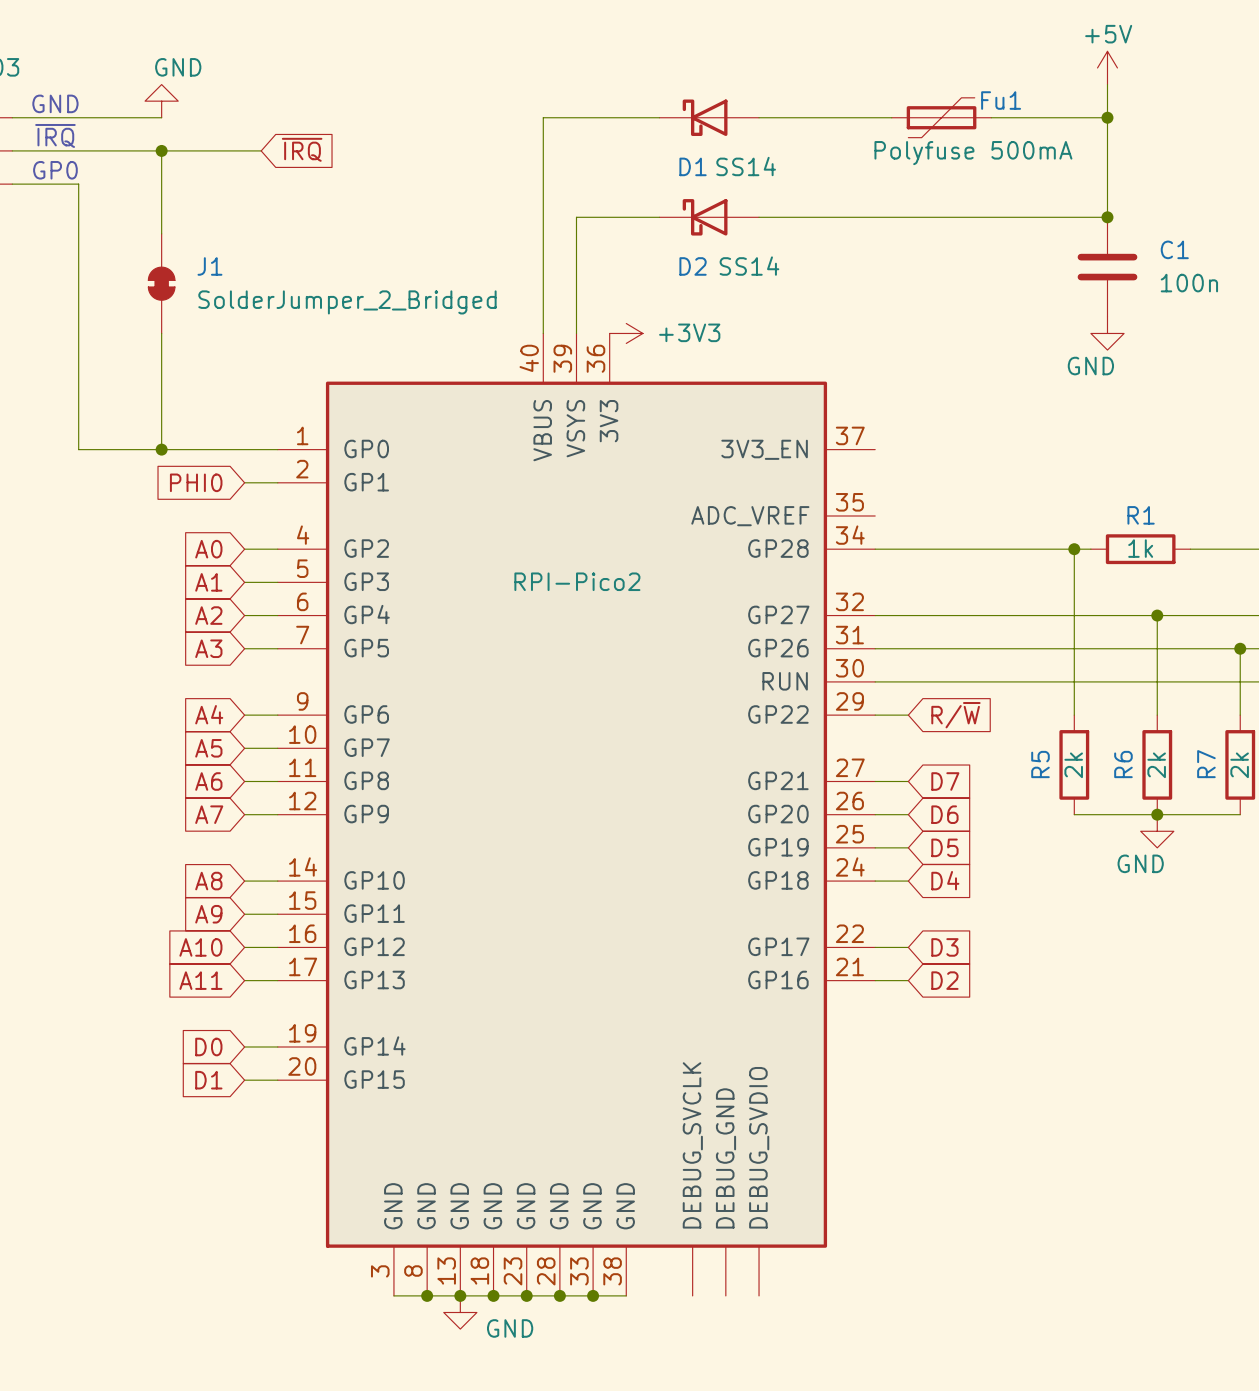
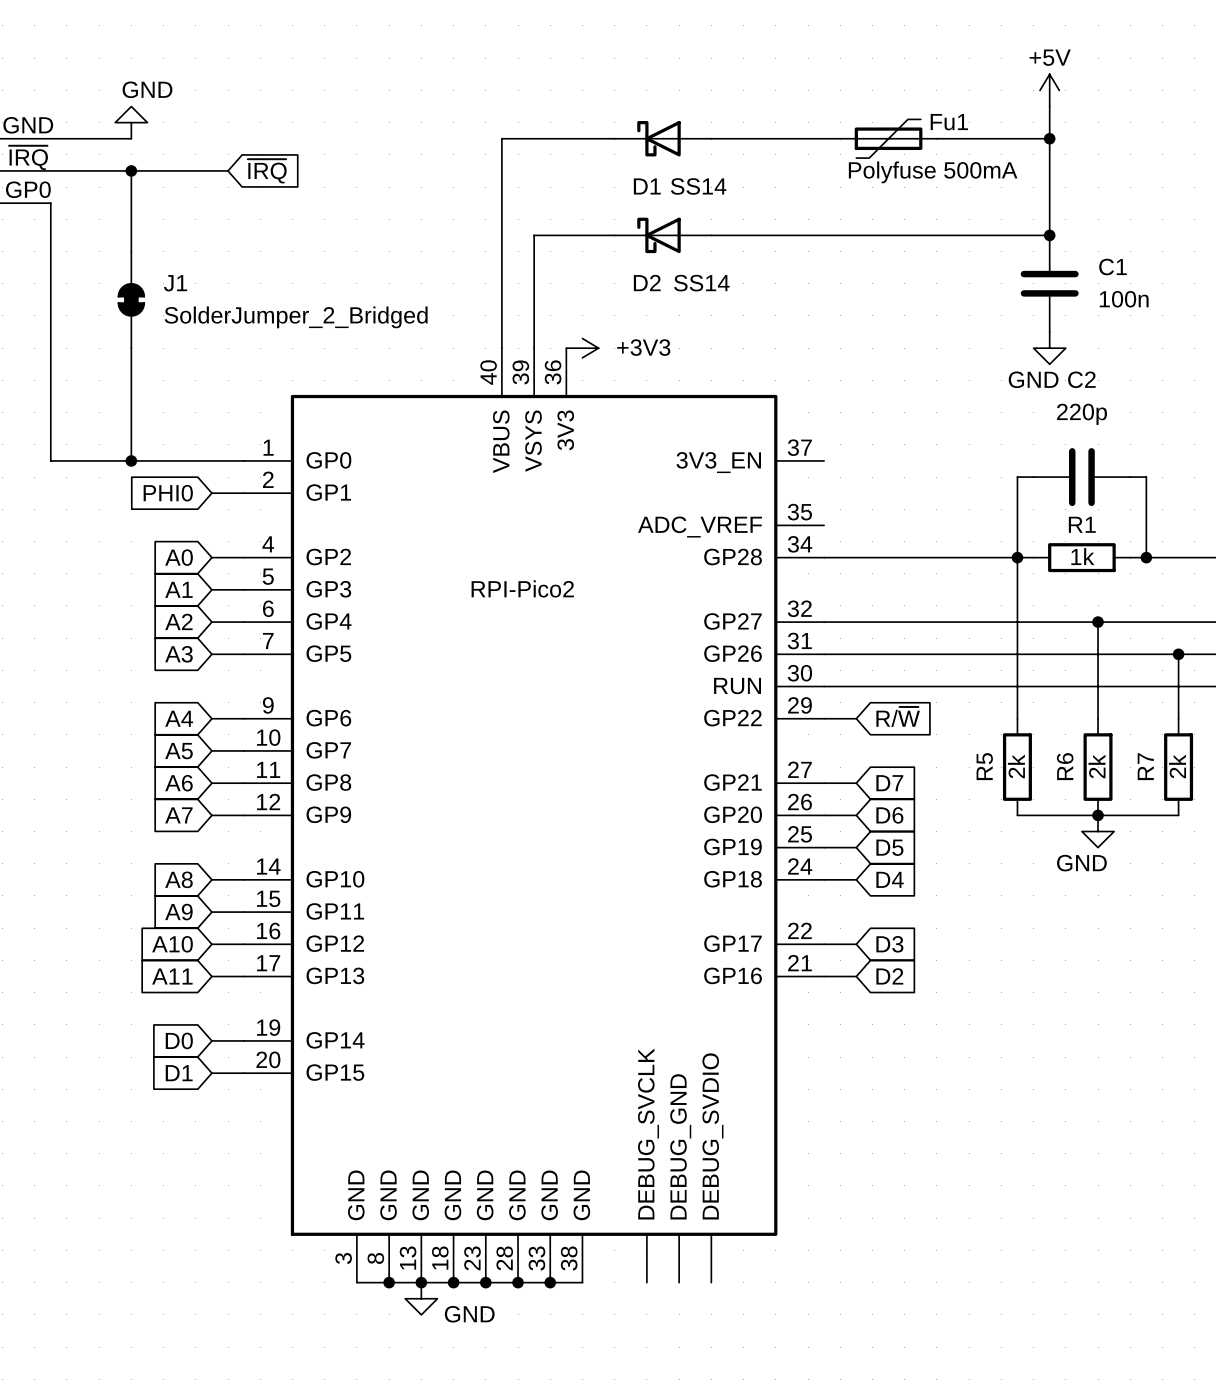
wire: none -> (1033, 477) (1017, 477) (1017, 557)
C2: none -> 220p (1081, 477)
wire: none -> (1130, 477) (1146, 477) (1146, 557)
junction: none -> (1146, 557)

